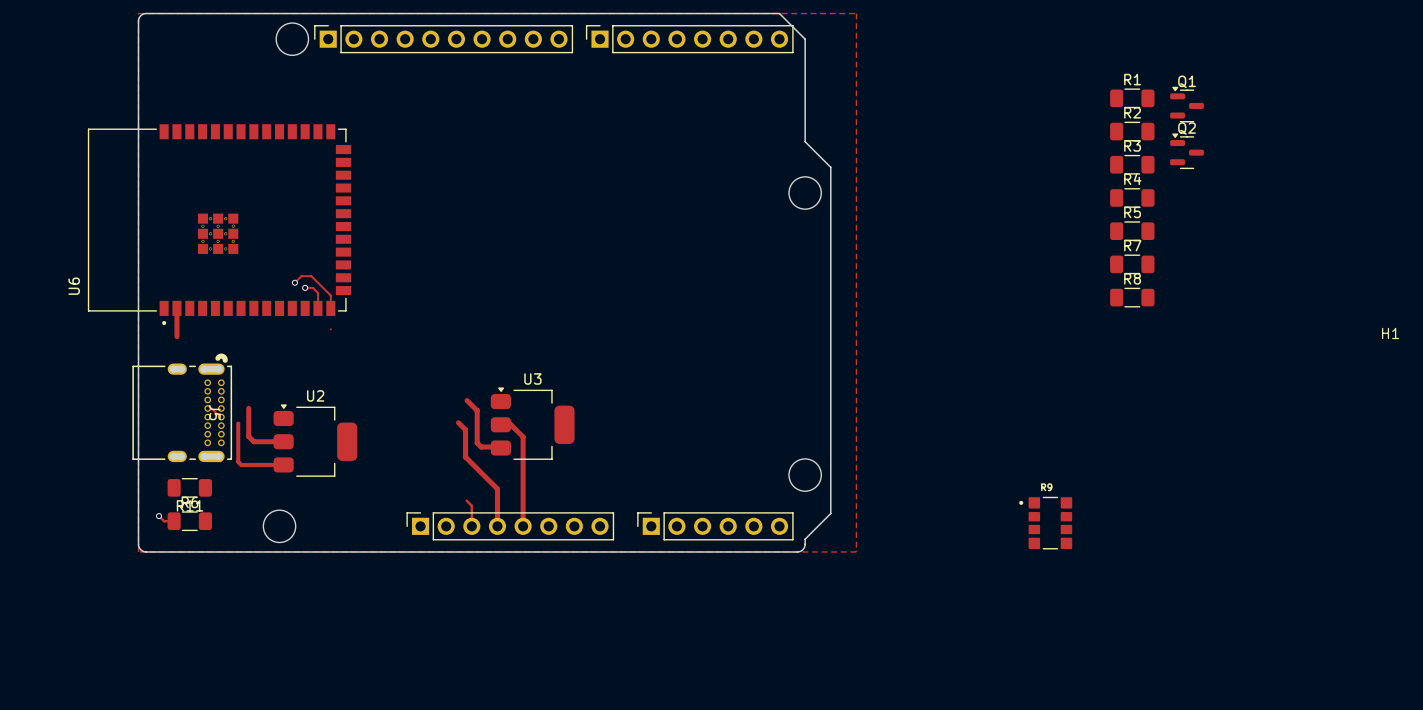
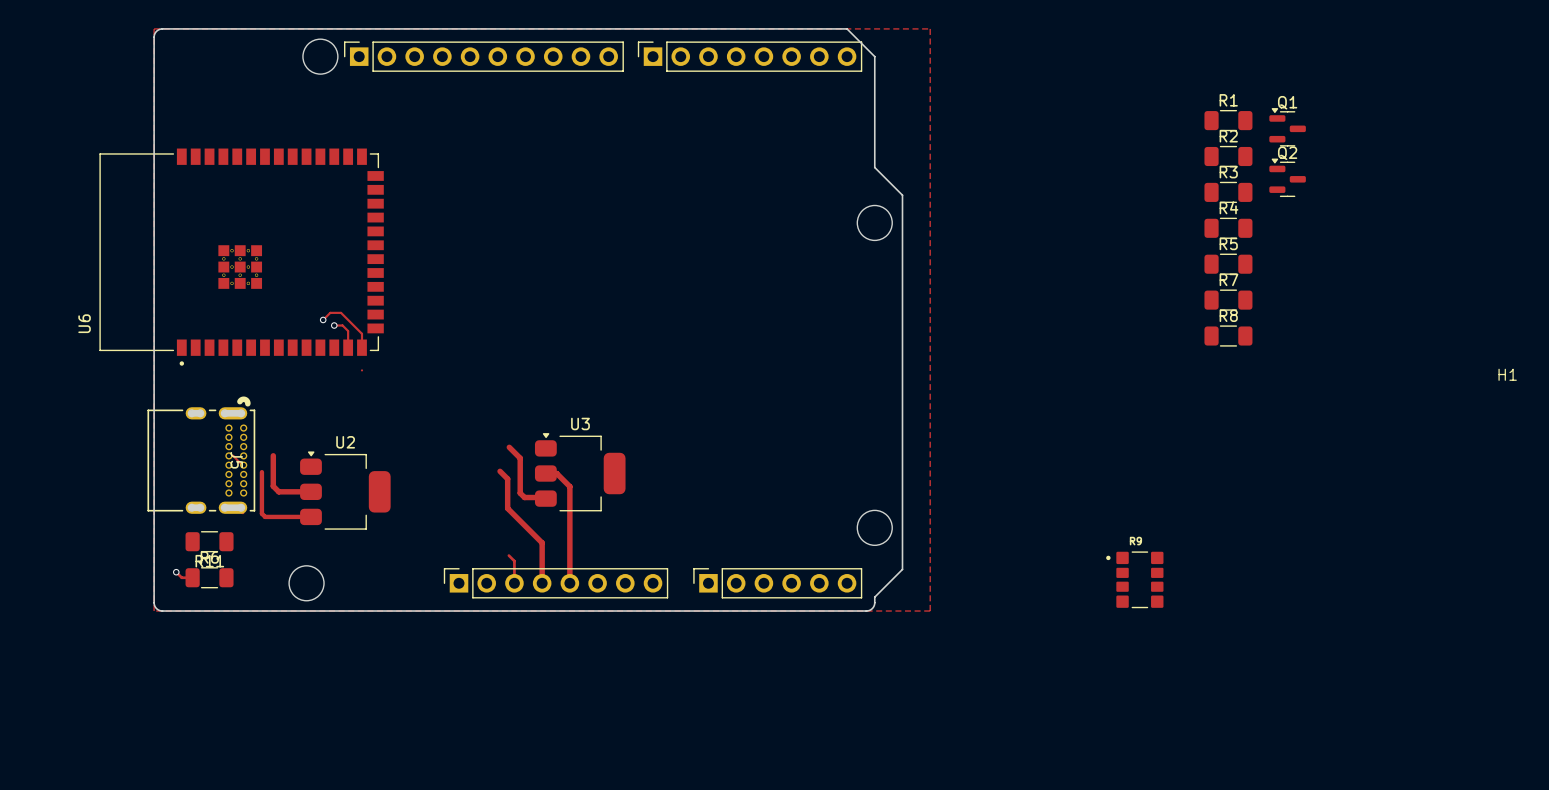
track: (176, 308) (176, 336) -> none

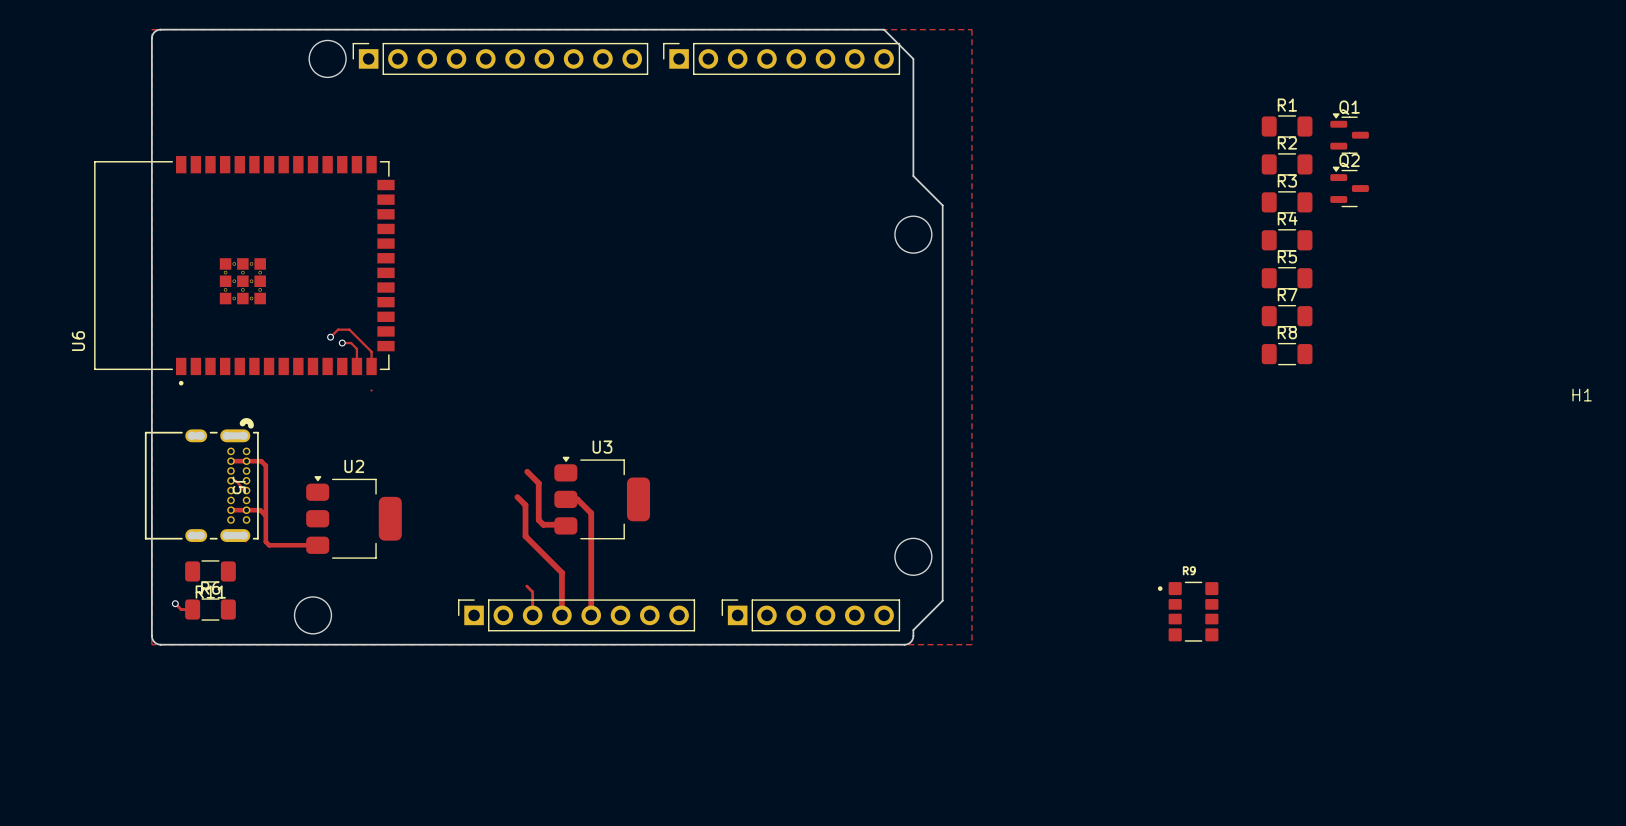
track: none -> (230, 461) (261, 461) (265, 465) (265, 497)
track: (273, 455) (273, 486) (278, 491) (299, 491) -> none
track: none -> (230, 510) (260, 510) (265, 515)

